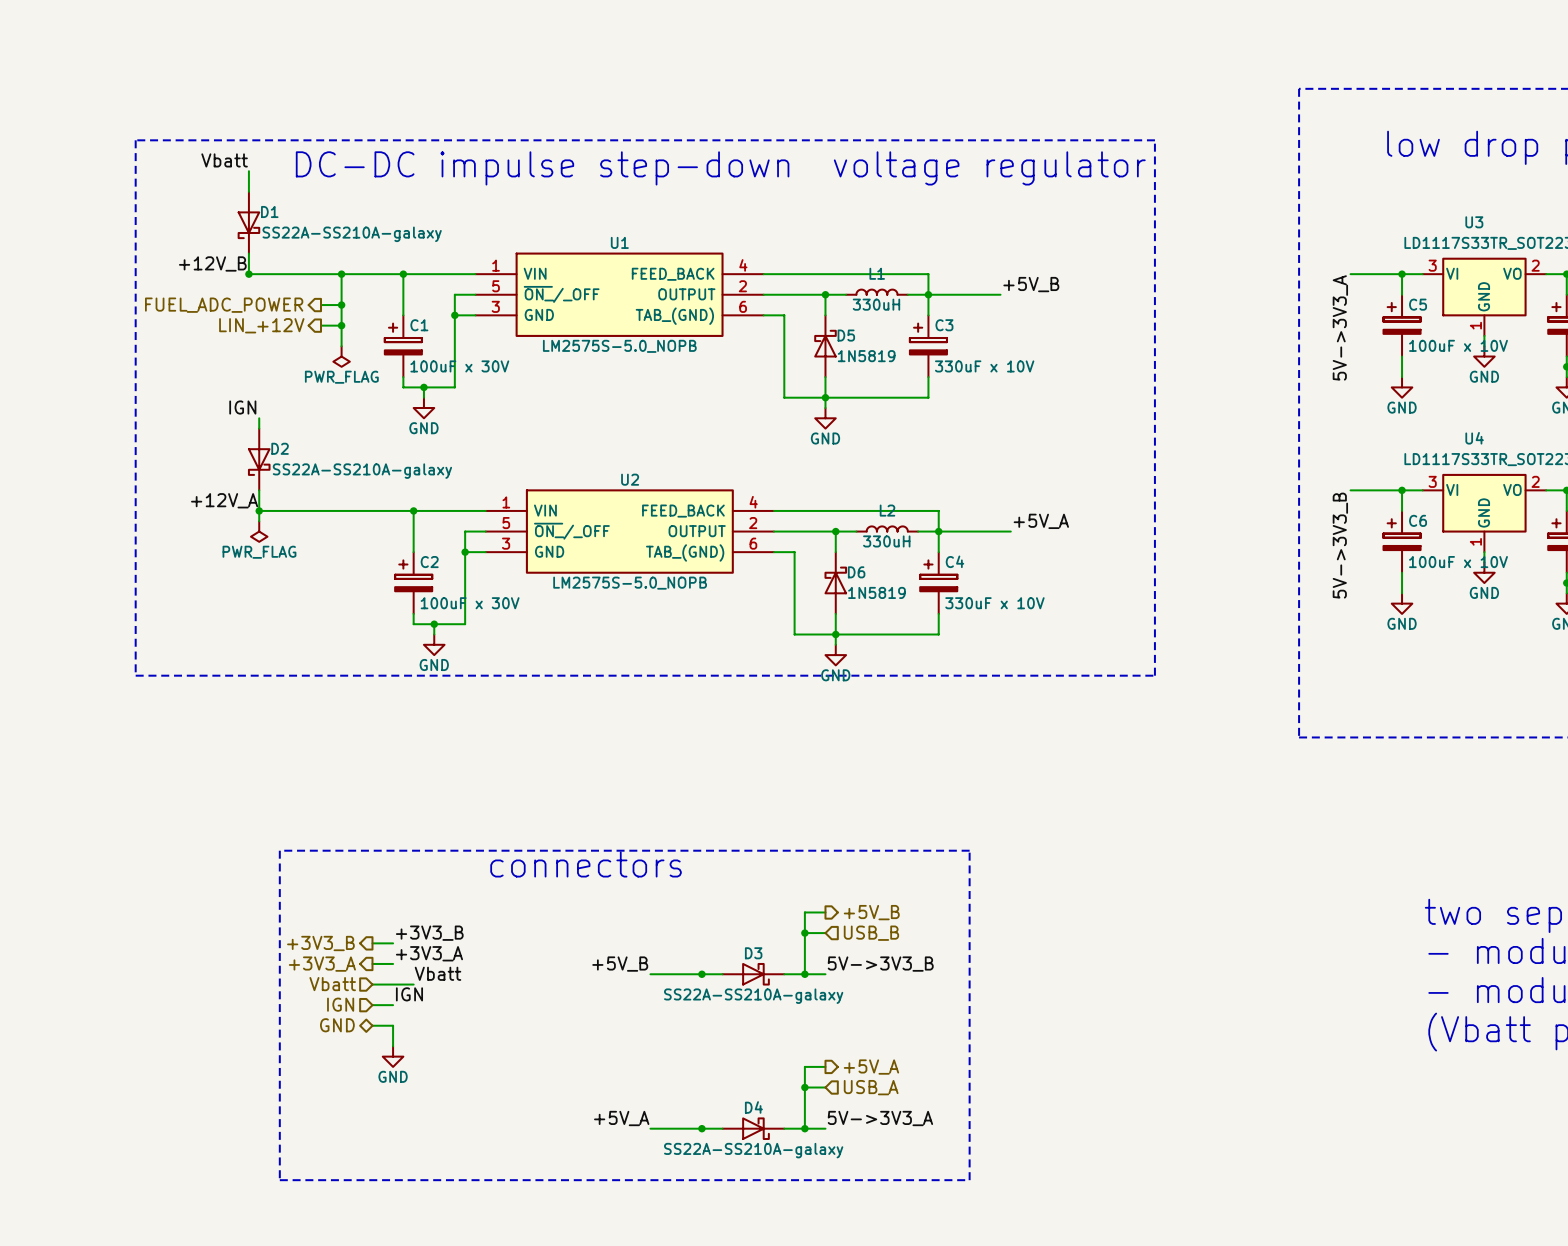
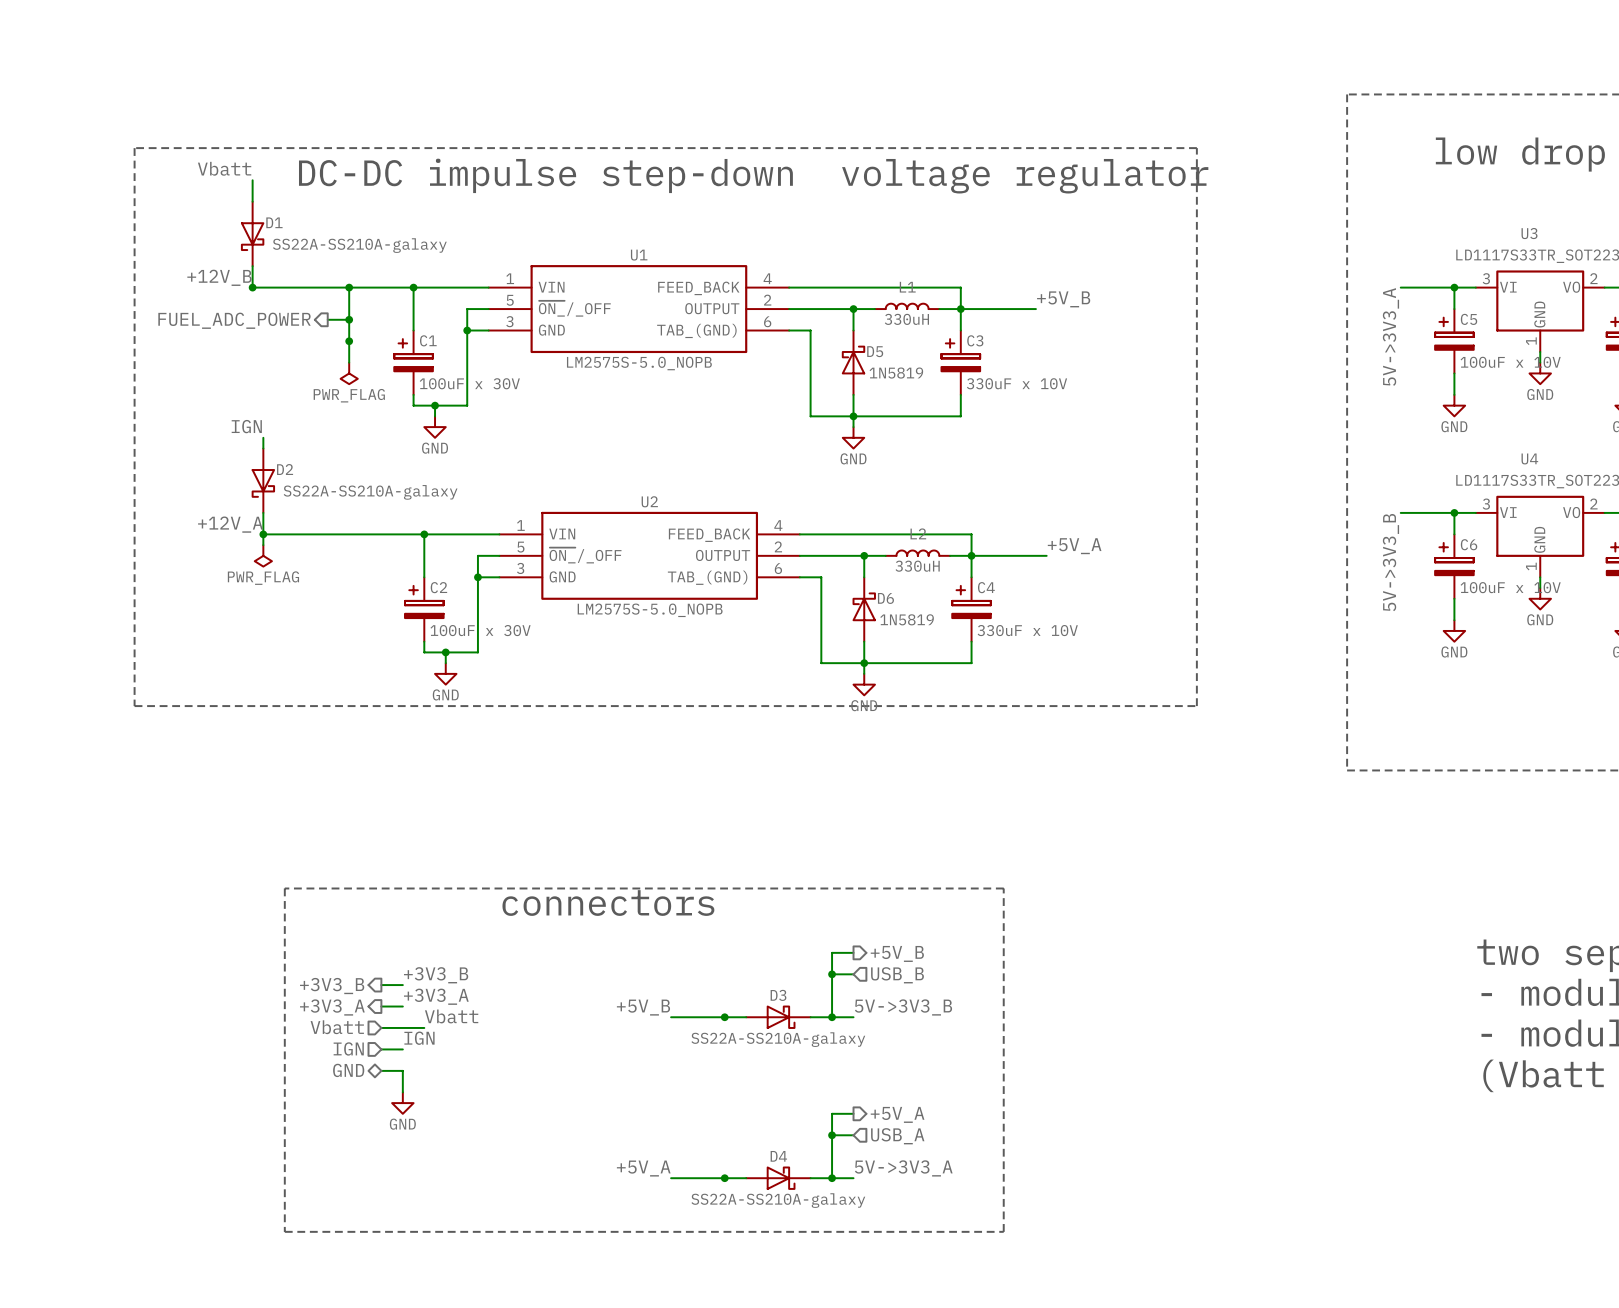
hierarchical label: LIN_+12V (261, 325) -> none
wire: (321, 325) (341, 325) -> none

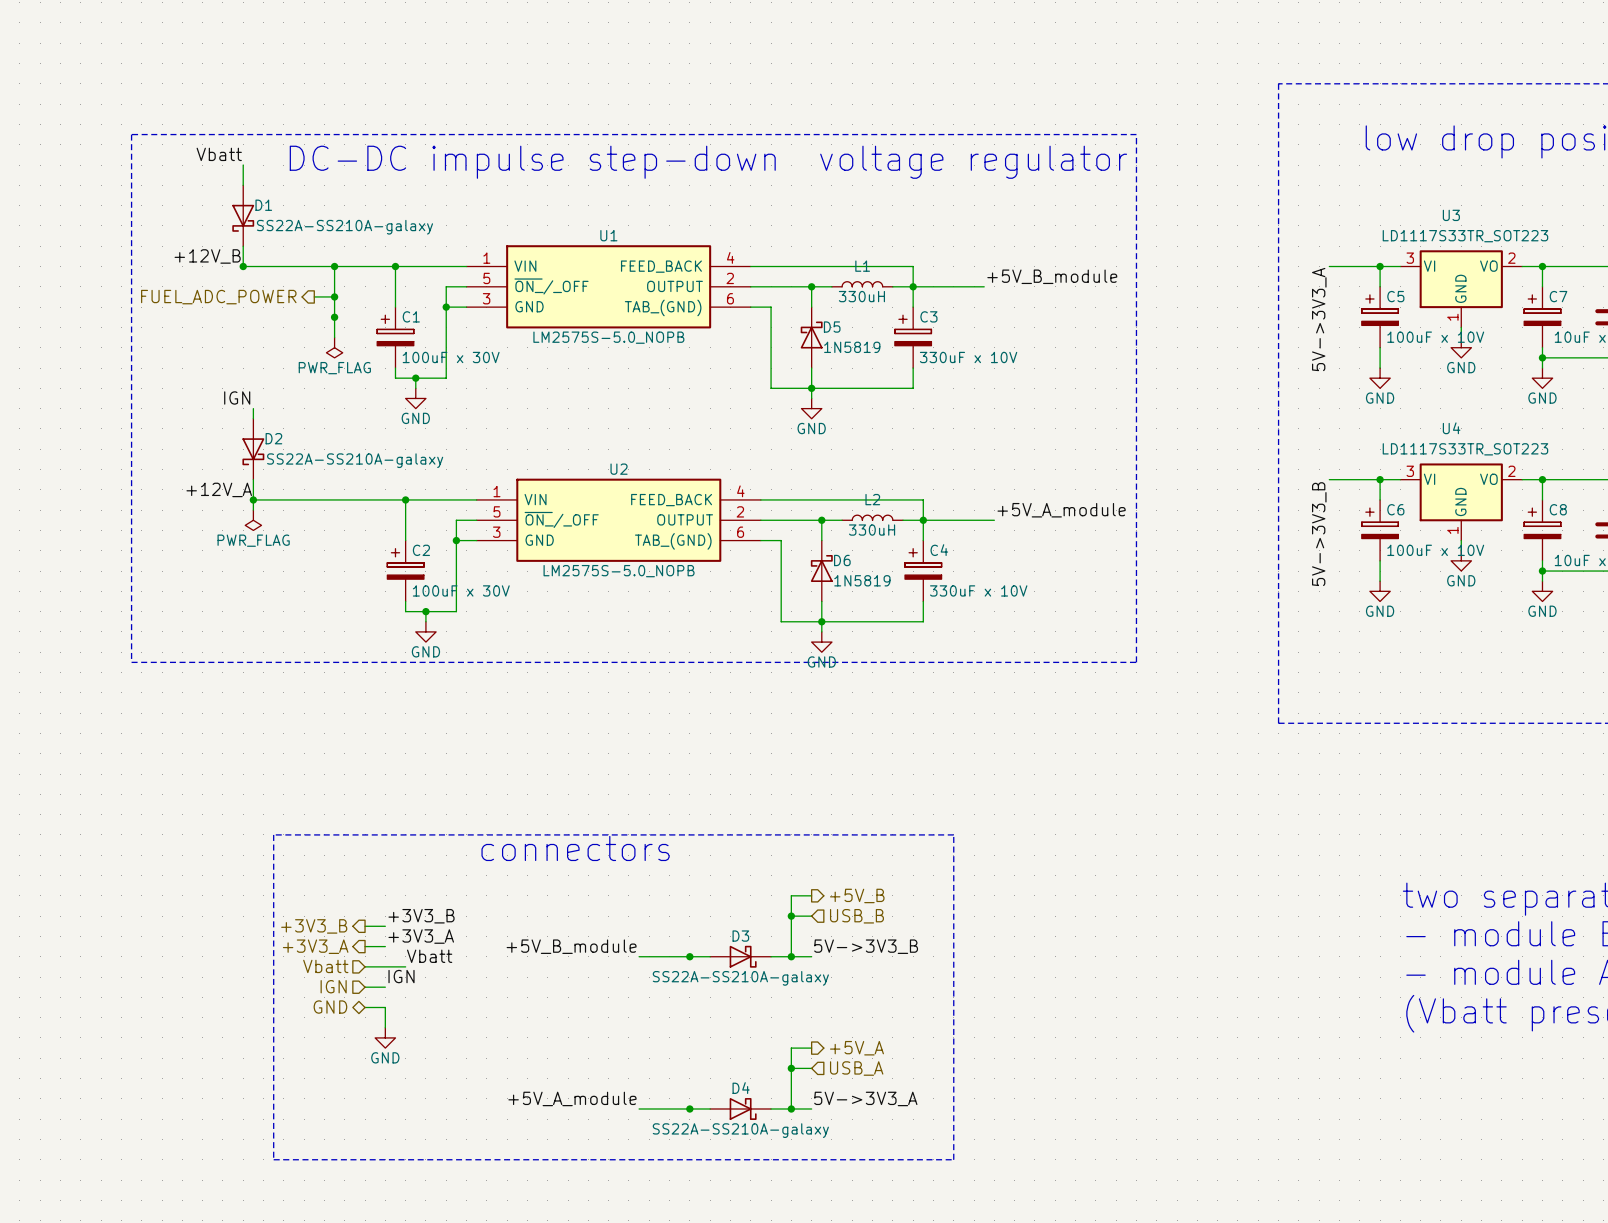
label: +5V_B (1063, 299) -> +5V_B_module (1052, 276)
label: +5V_A (1074, 546) -> +5V_A_module (1061, 510)
label: +5V_B (643, 1007) -> +5V_B_module (571, 946)
label: +5V_A (643, 1168) -> +5V_A_module (572, 1098)

